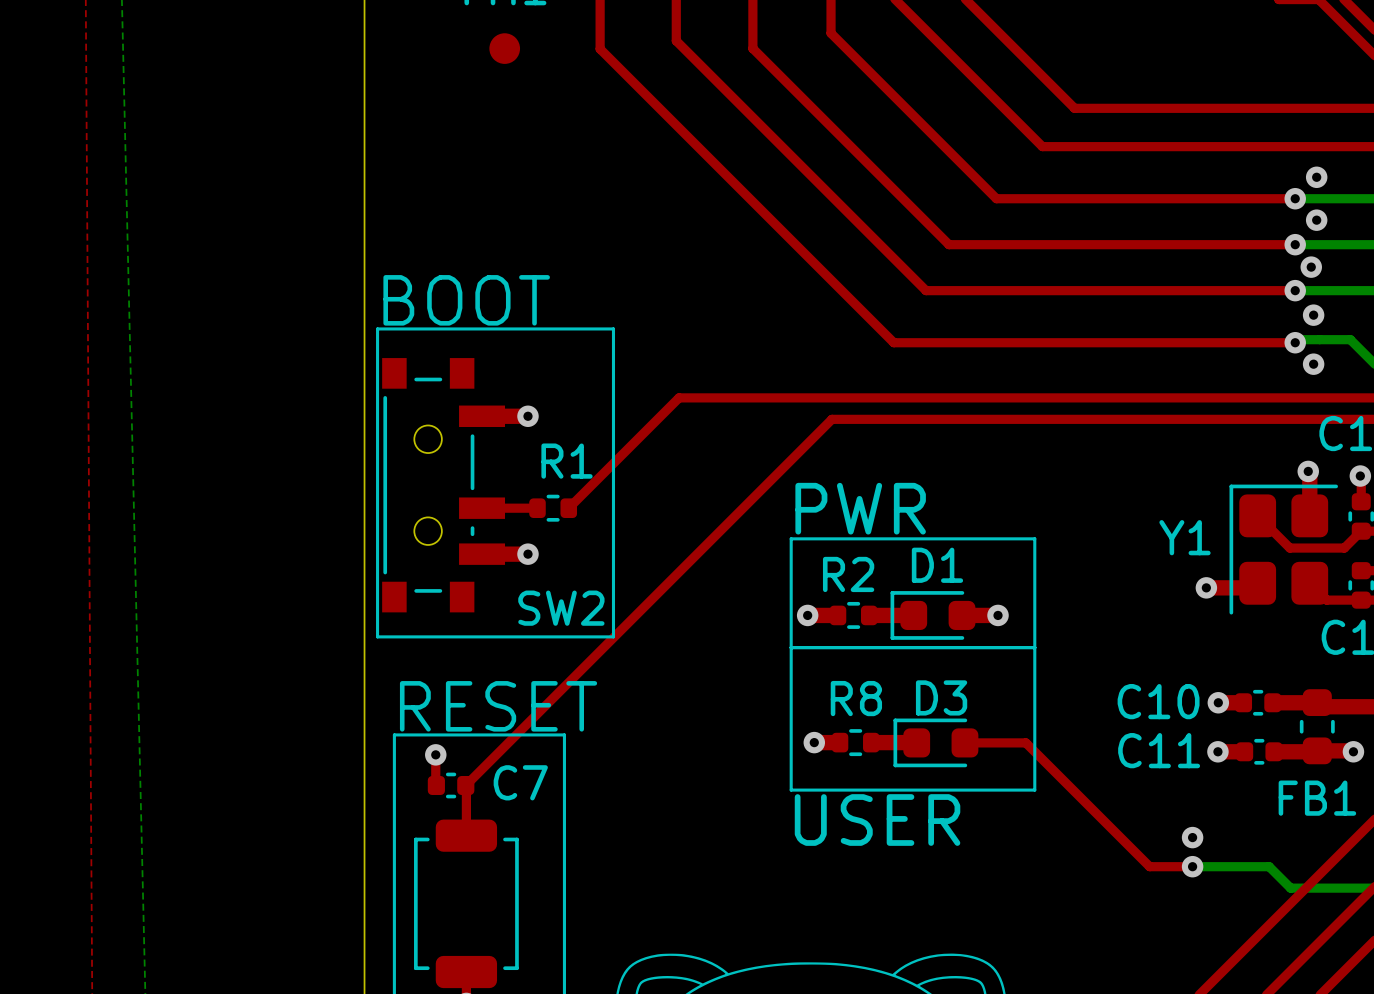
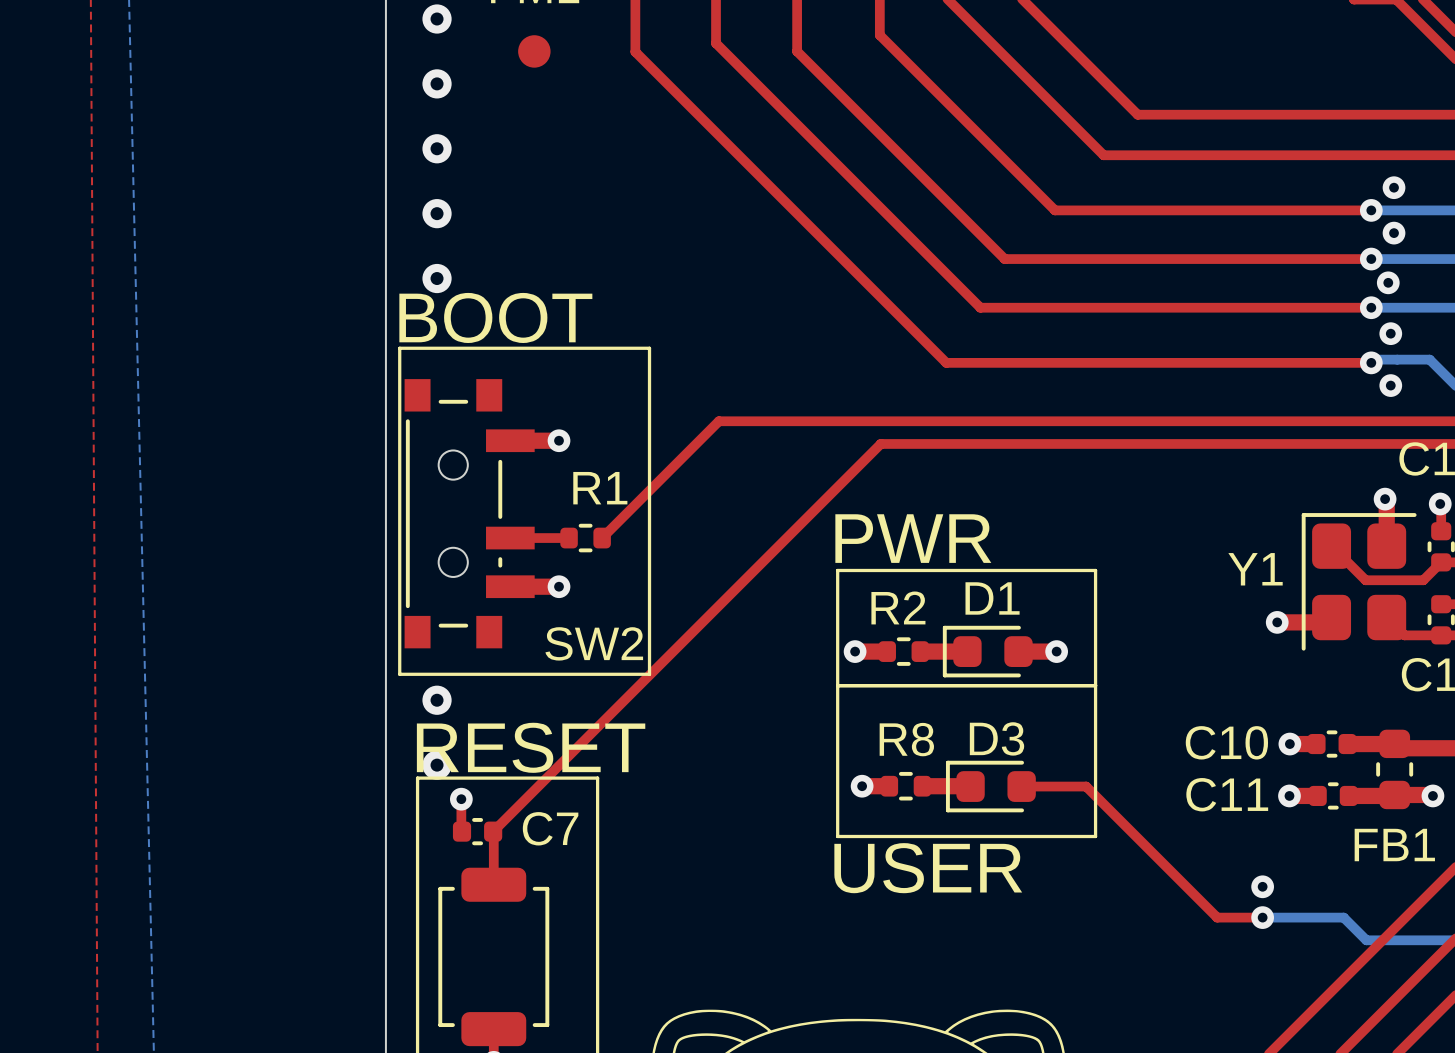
via: none -> (437, 19)
via: none -> (437, 83)
via: none -> (437, 148)
via: none -> (437, 213)
via: none -> (437, 278)
via: none -> (437, 700)
via: none -> (437, 765)

